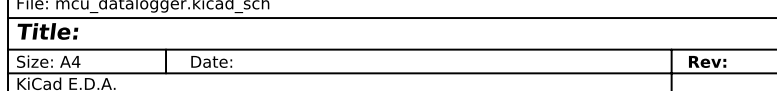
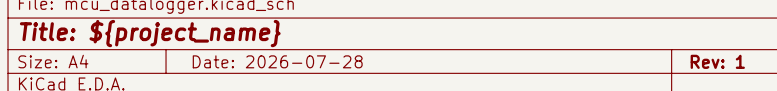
title block: Title: (47, 31) -> Title: ${project_name} (150, 33)
title block: Date: (211, 61) -> Date: 2026-07-28 (277, 61)
title block: Rev: (707, 61) -> Rev: 1 (717, 61)

